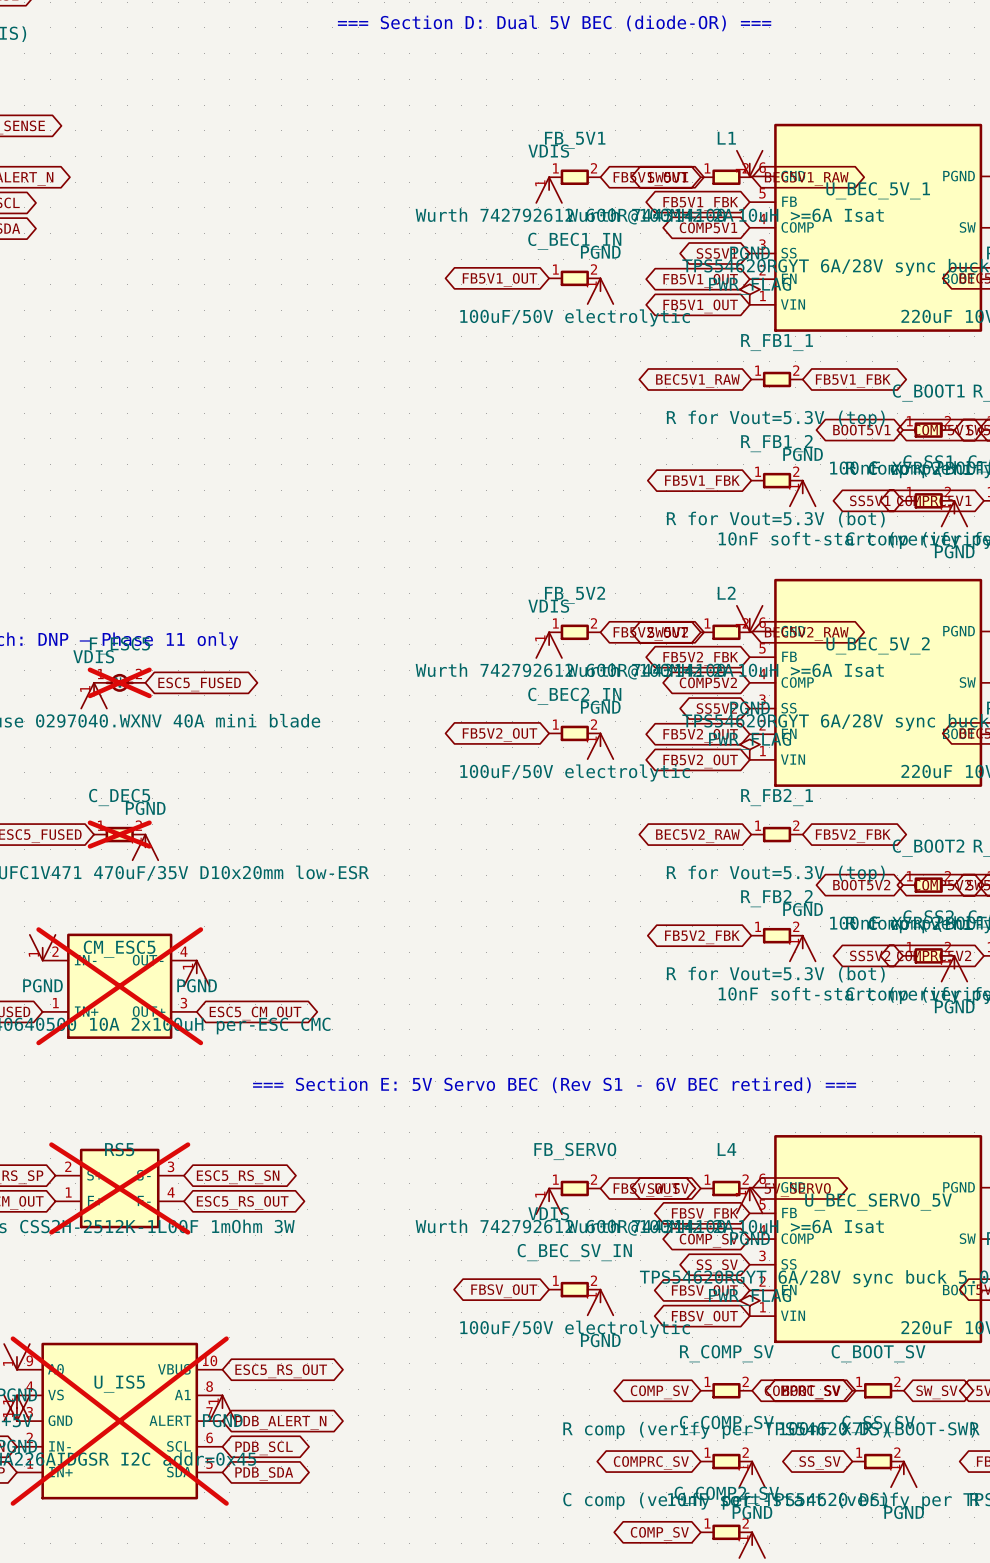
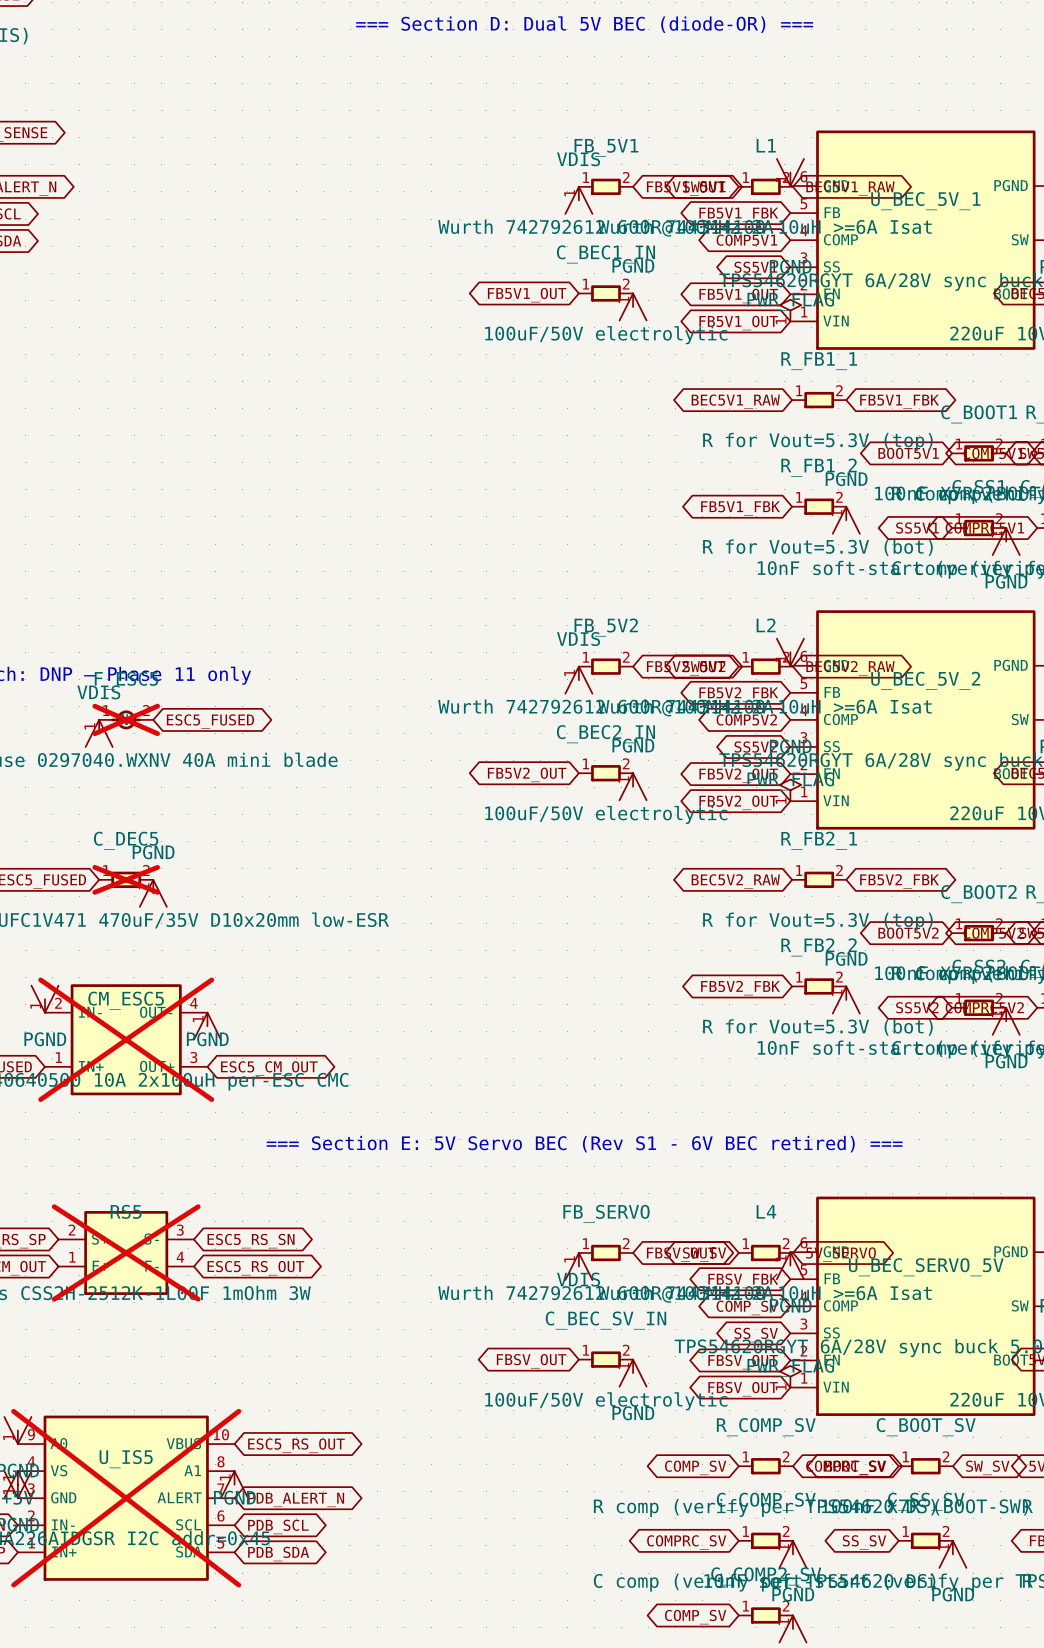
power symbol pin number: none -> 1 (781, 321)
power symbol pin number: none -> 1 (781, 800)
power symbol pin number: none -> 1 (781, 1387)

